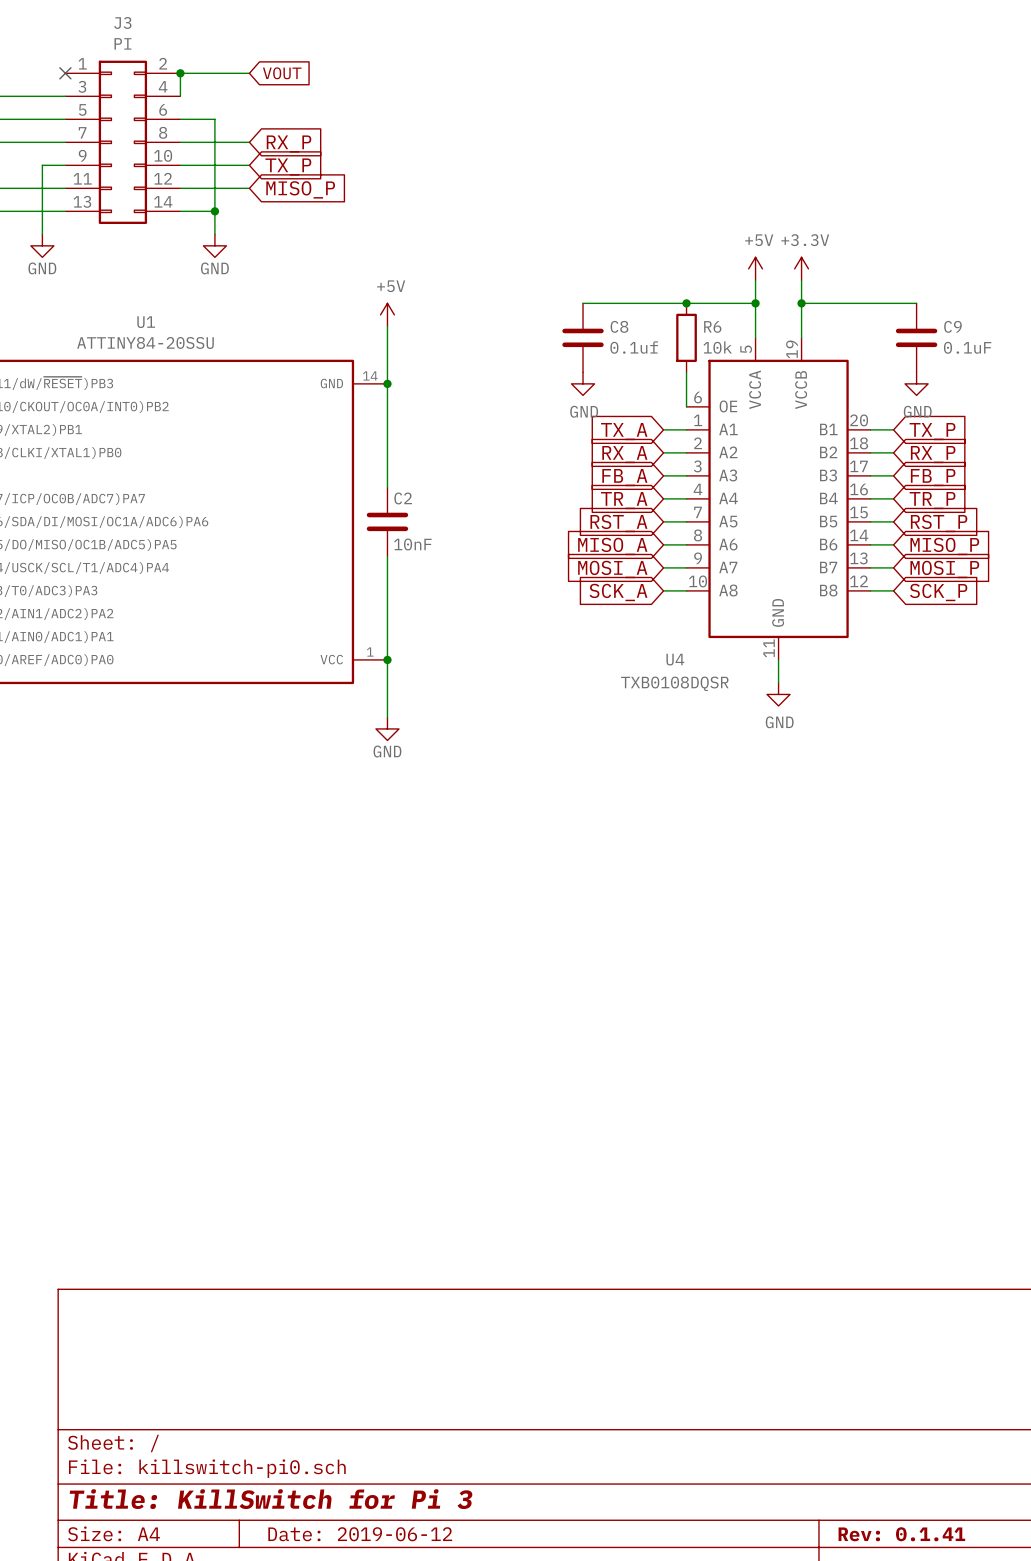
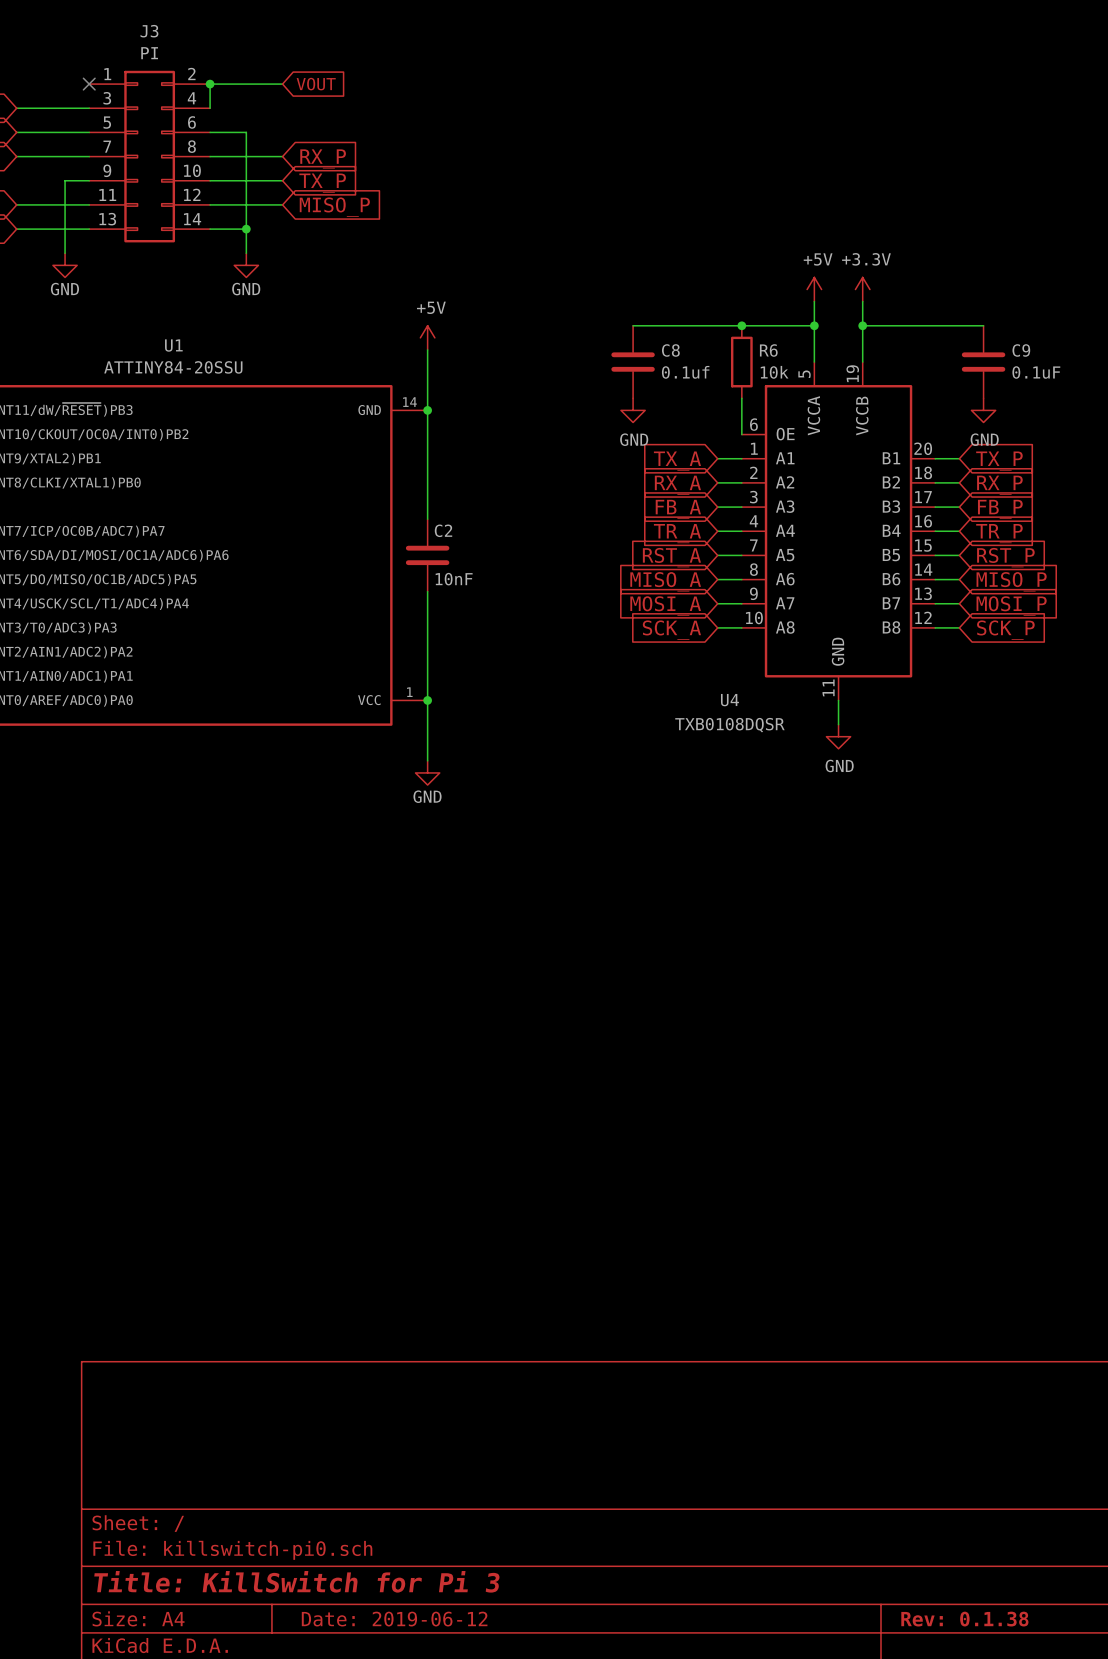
title block: Rev: 0.1.41 (901, 1534) -> Rev: 0.1.38 (964, 1619)

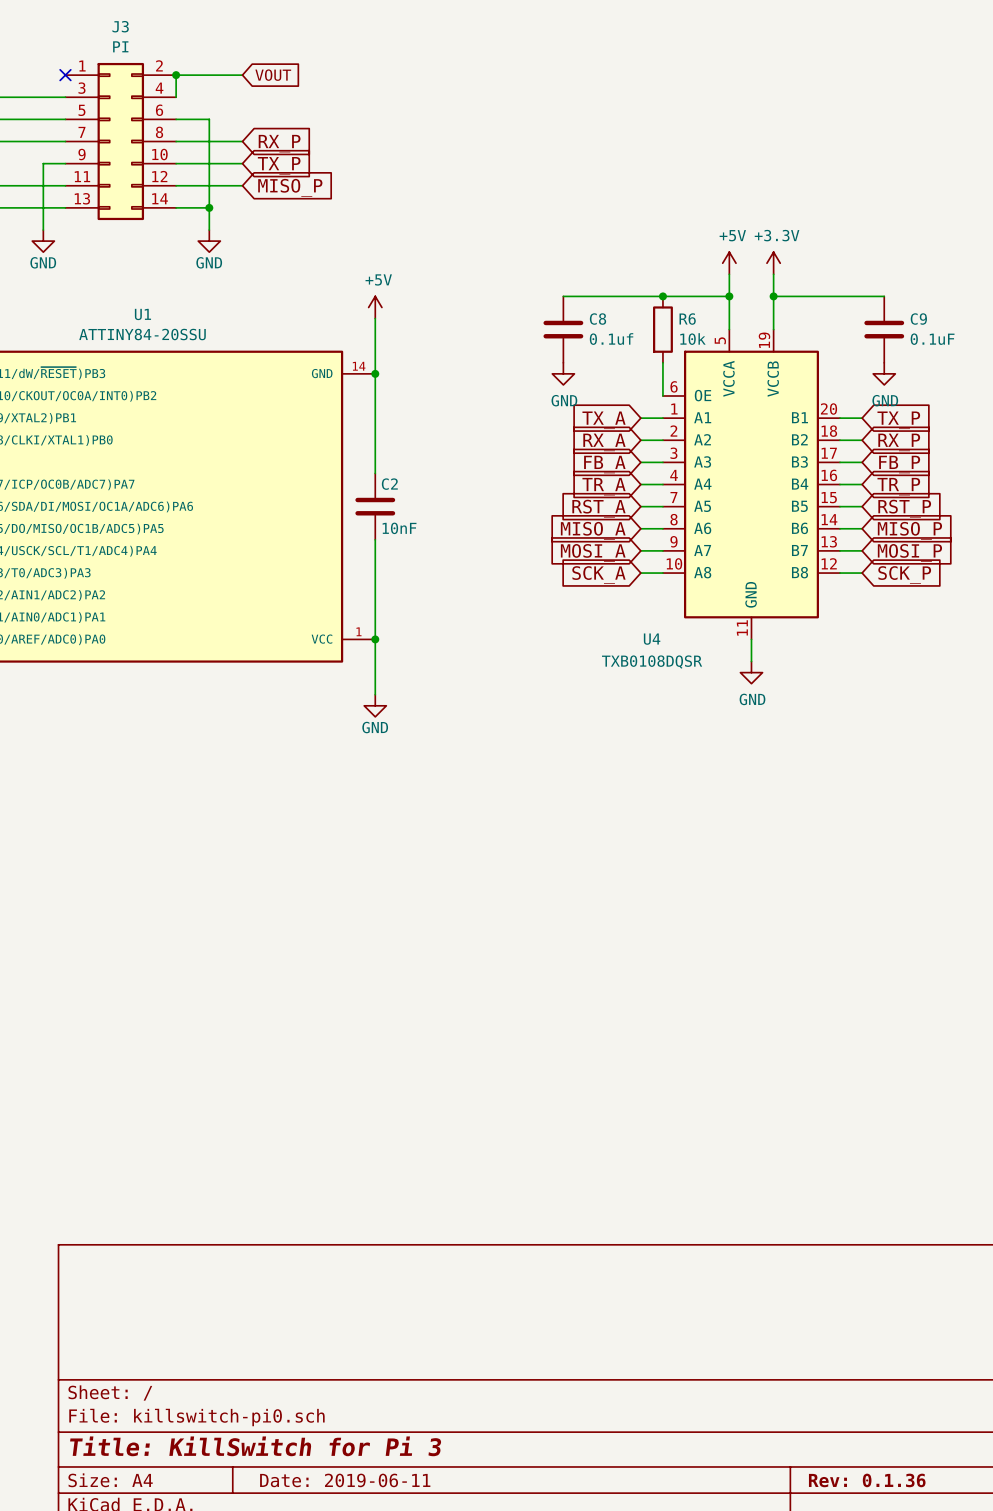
title block: Date: 2019-06-12 (394, 1619) -> Date: 2019-06-11 (345, 1480)
title block: Rev: 0.1.38 (964, 1619) -> Rev: 0.1.36 (867, 1480)

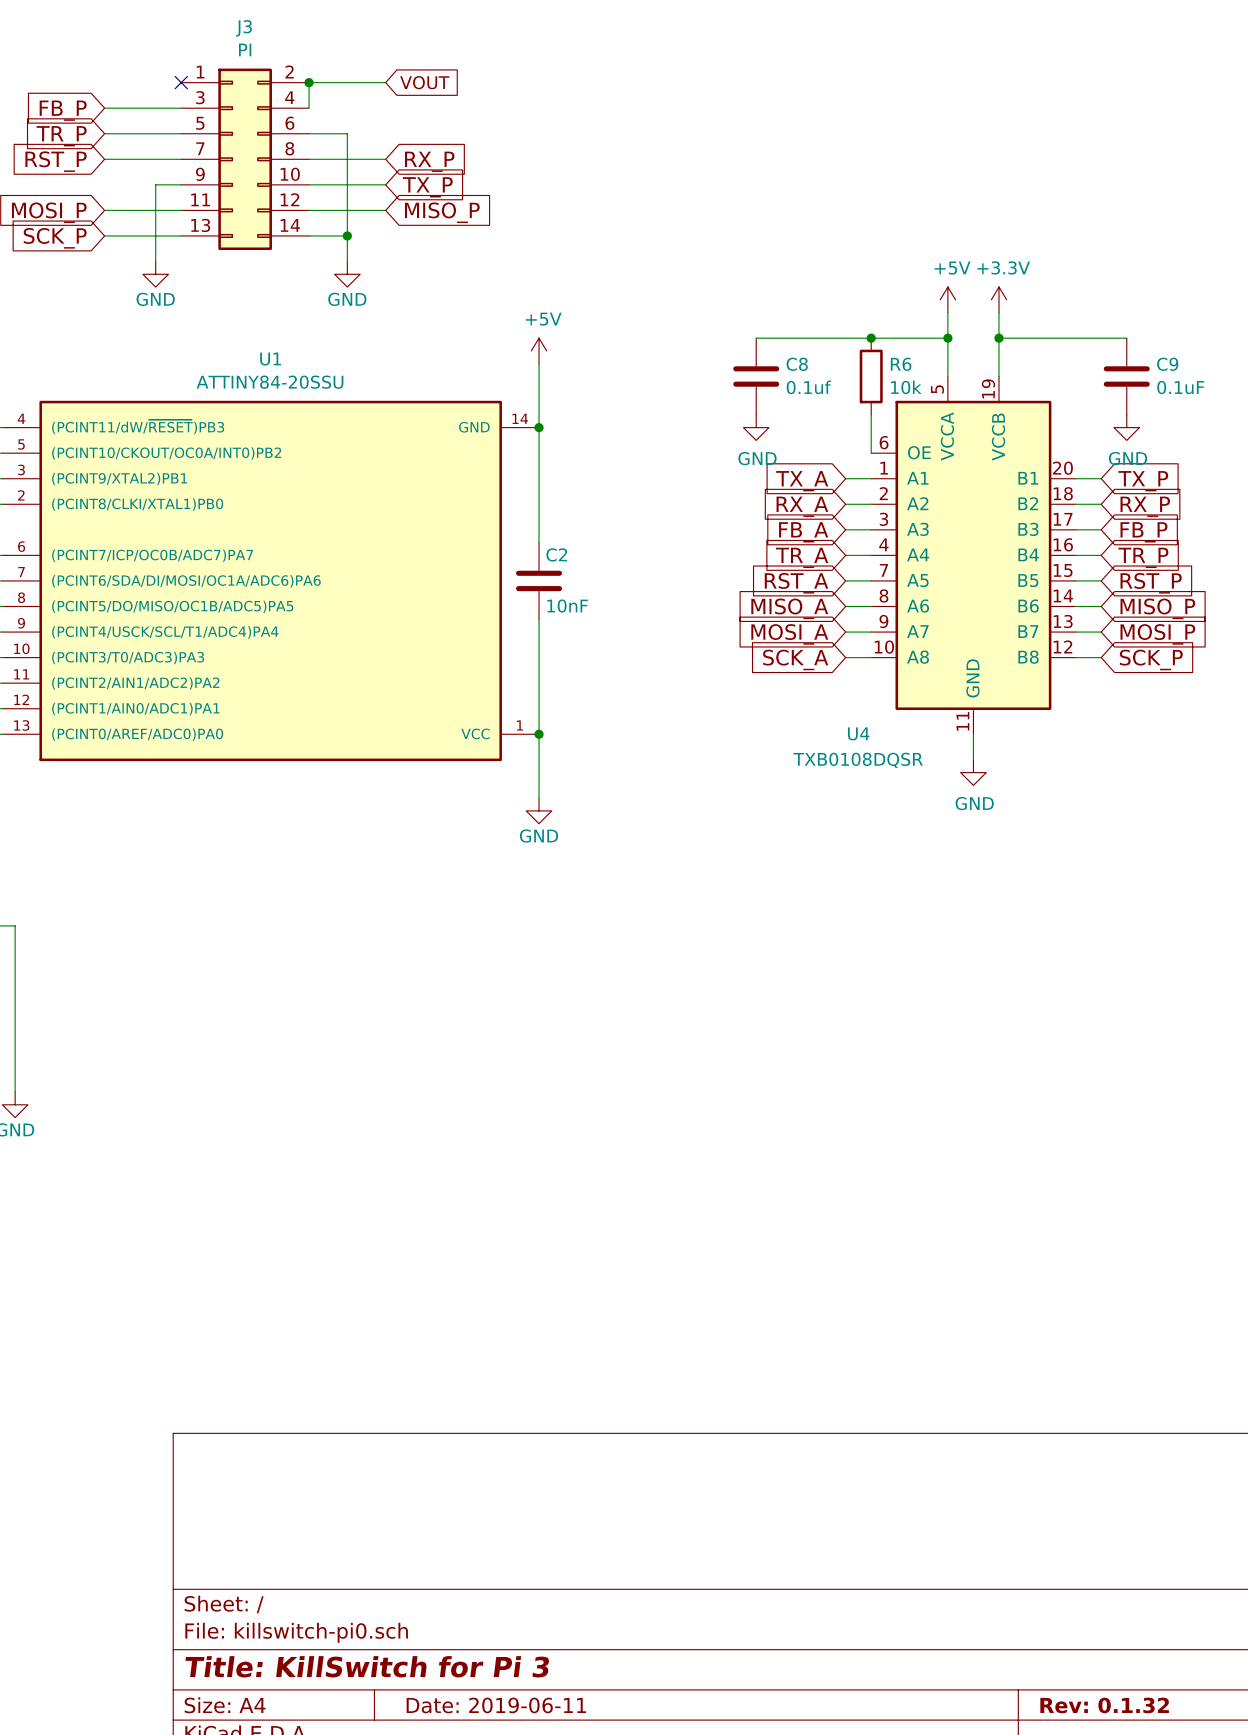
title block: Rev: 0.1.36 (867, 1480) -> Rev: 0.1.32 (1104, 1705)

